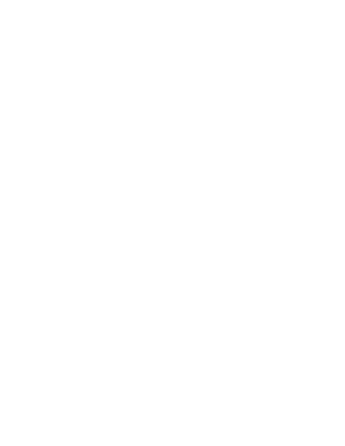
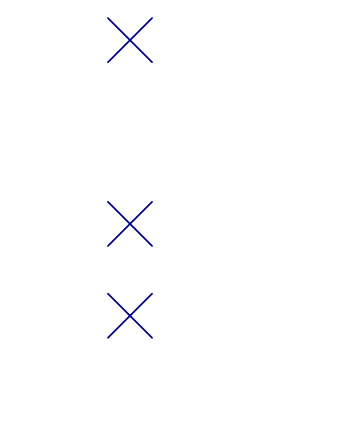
no-connect mark: none -> (130, 40)
no-connect mark: none -> (130, 223)
no-connect mark: none -> (130, 315)

